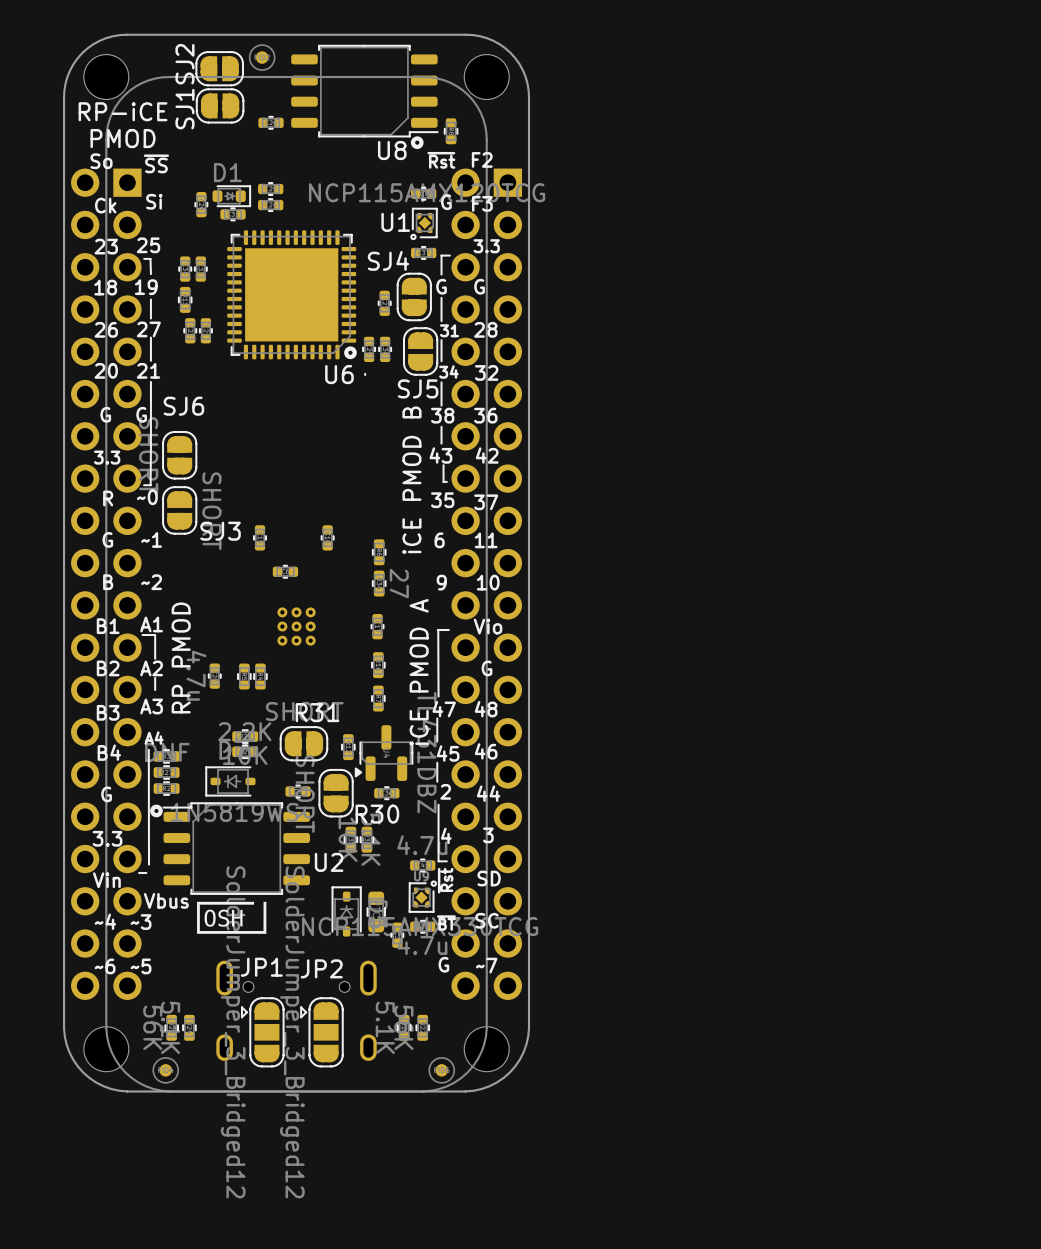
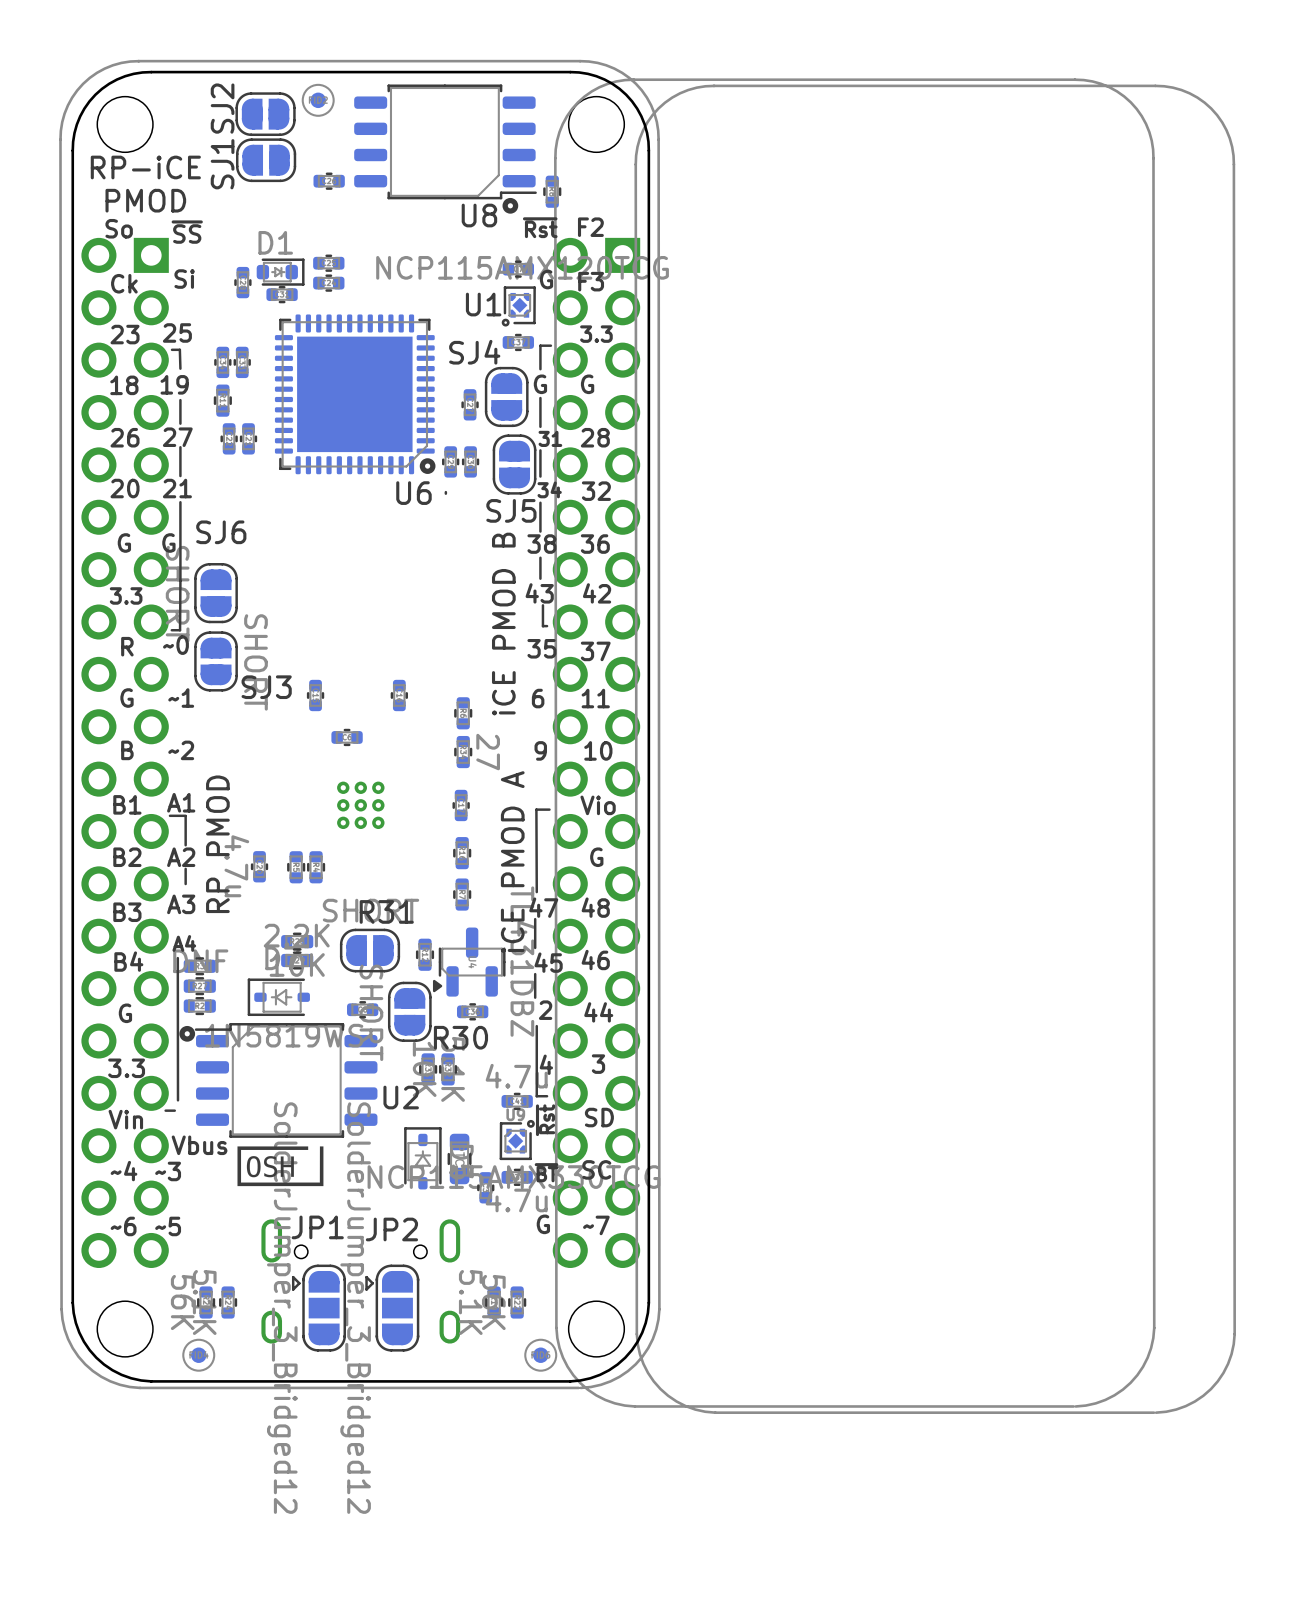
line: none -> (139, 61) (112, 65) (96, 72) (83, 83) (67, 105) (60, 130) (61, 1309) (64, 1329) (72, 1348) (85, 1364) (101, 1376) (129, 1387) (578, 1387)
line: none -> (138, 61) (588, 61) (614, 68) (629, 77) (646, 97) (654, 113) (658, 139) (659, 1309) (652, 1339) (635, 1364) (610, 1381) (580, 1387)
line: none -> (633, 79) (616, 81) (599, 87) (578, 102) (562, 123) (555, 149) (556, 1327) (559, 1348) (567, 1366) (587, 1389) (605, 1399) (624, 1405) (1073, 1406)
line: none -> (633, 79) (1083, 80) (1109, 87) (1124, 96) (1141, 116) (1149, 132) (1153, 158) (1154, 1327) (1147, 1357) (1130, 1382) (1105, 1399) (1075, 1406)
line: none -> (714, 85) (688, 90) (665, 102) (652, 115) (643, 130) (636, 155) (636, 1334) (639, 1354) (653, 1381) (668, 1395) (685, 1406) (705, 1411) (1154, 1412)
line: none -> (713, 85) (1164, 86) (1181, 90) (1204, 102) (1217, 115) (1229, 138) (1233, 164) (1234, 1334) (1228, 1363) (1211, 1389) (1185, 1406) (1156, 1412)
line: (423, 77) (162, 77) (142, 83) (124, 95) (115, 106) (107, 126) (106, 1028) (111, 1052) (119, 1066) (138, 1082) (153, 1088) (169, 1091) (431, 1090) (454, 1082) (467, 1072) (477, 1059) (484, 1044) (486, 1028) (486, 133) (480, 112) (468, 95) (451, 83) (437, 78) (423, 77) -> none

